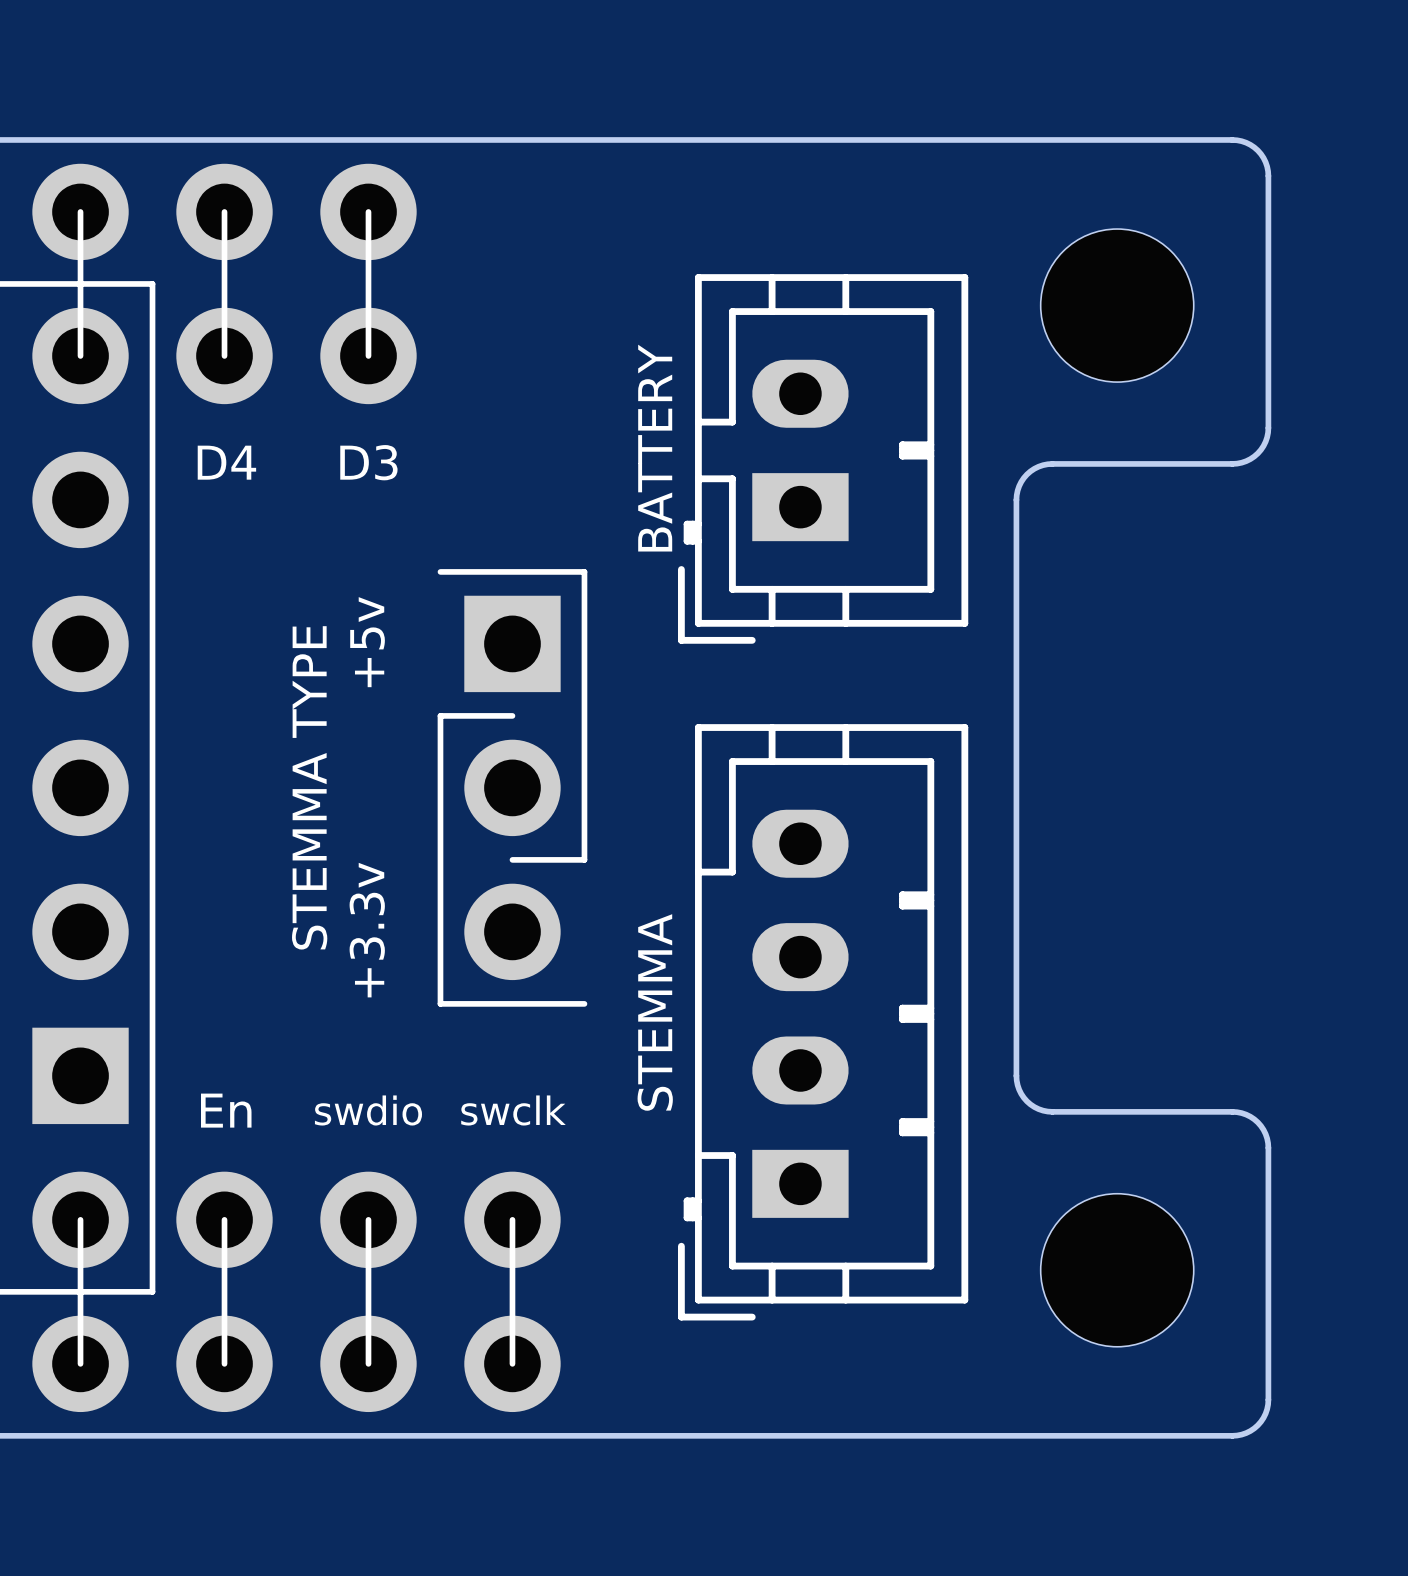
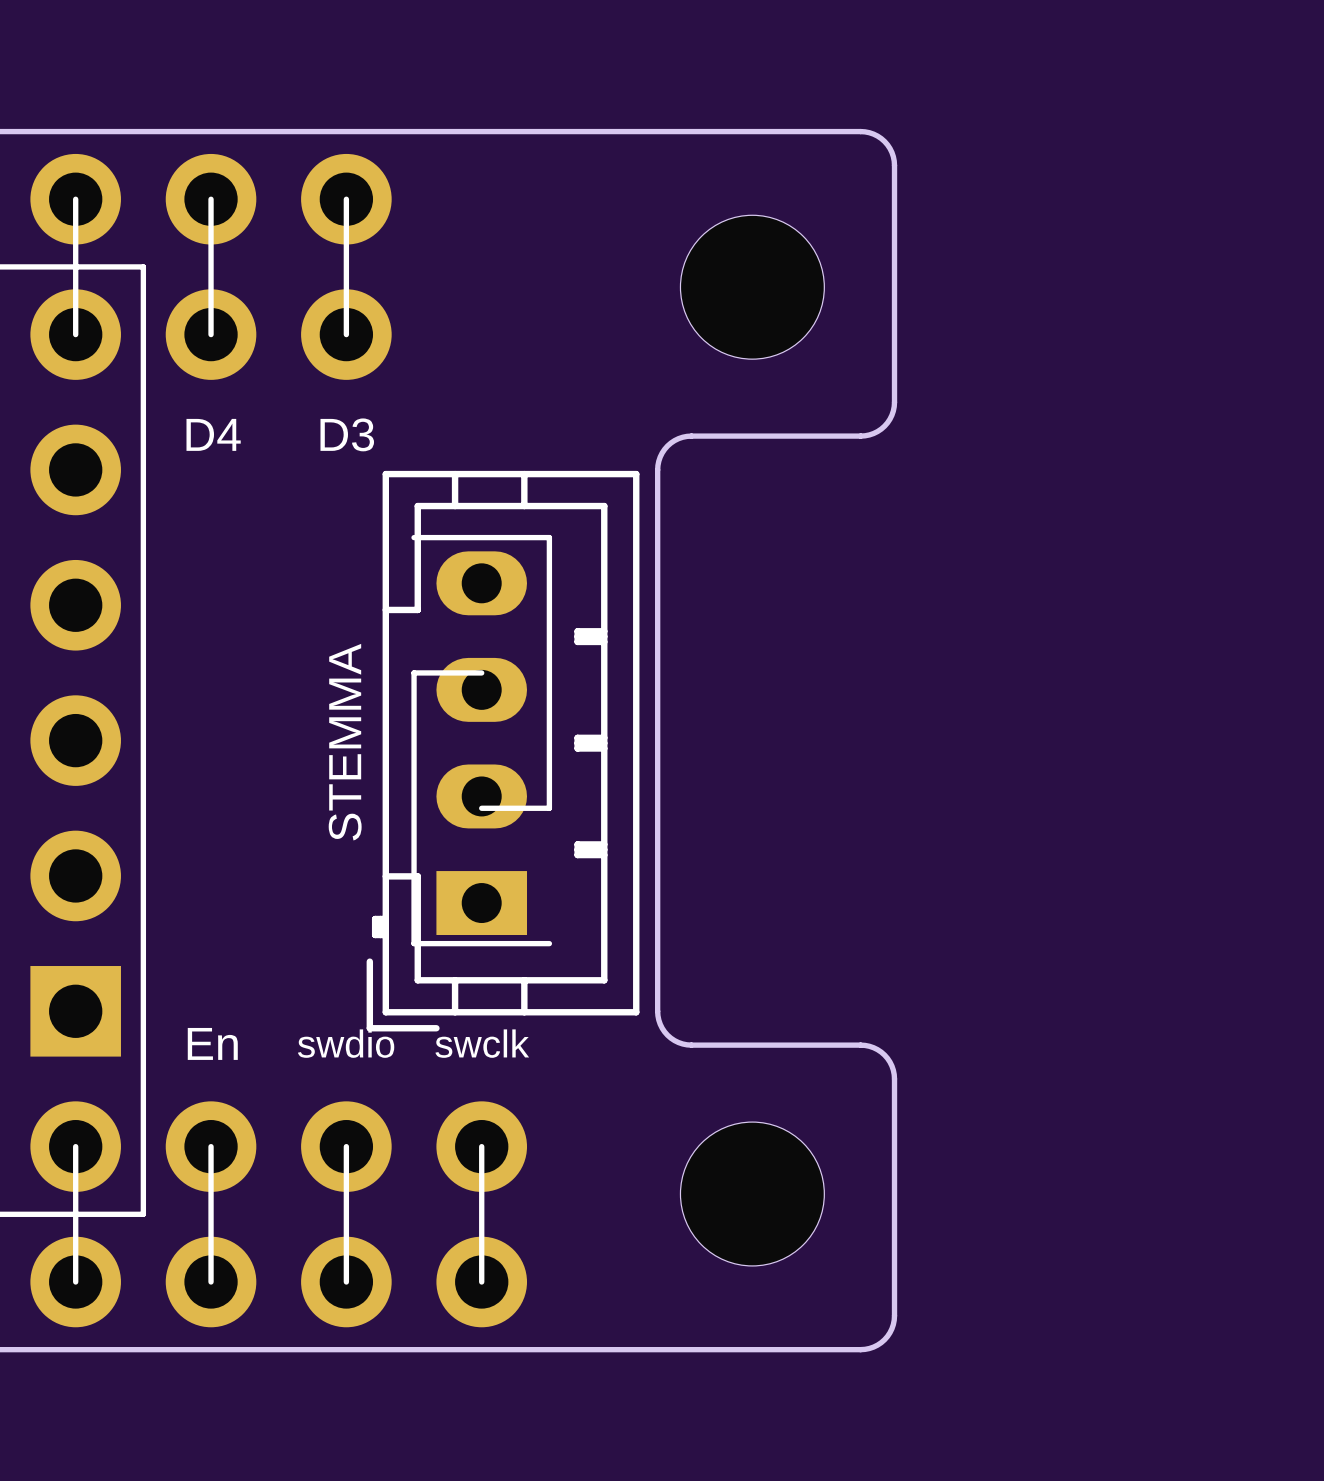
board edge: (915, 139) (1237, 140) (1254, 147) (1260, 154) (1267, 166) (1268, 427) (1265, 441) (1260, 449) (1250, 459) (1237, 463) (1043, 465) (1034, 468) (1023, 478) (1019, 486) (1016, 499) (1016, 1075) (1019, 1089) (1030, 1104) (1047, 1111) (1232, 1111) -> (860, 131) (869, 132) (881, 138) (889, 148) (894, 160) (894, 402) (889, 419) (877, 431) (865, 435) (682, 437) (667, 446) (660, 456) (657, 465) (657, 1011) (660, 1024) (667, 1035) (678, 1042) (691, 1045)
part position: (1117, 305) -> (752, 287)
part: BATTERY (823, 458) -> none
part footprint: [464, 595, 561, 981] -> [366, 470, 640, 1032]
text: +5v (367, 642) -> none
text: STEMMA TYPE (309, 787) -> none
part value: none -> STEMMA (345, 742)
text: +3.3v (367, 930) -> none
part: STEMMA (823, 1022) -> none
board edge: (1232, 1111) (1246, 1114) (1257, 1122) (1263, 1129) (1268, 1143) (1268, 1399) -> none
part position: (1117, 1270) -> (752, 1194)
board edge: (1268, 1399) (1267, 1409) (1260, 1421) (1250, 1431) (1237, 1435) (915, 1435) -> (691, 1045) (865, 1045) (881, 1052) (889, 1062) (894, 1078) (894, 1320) (889, 1332) (881, 1342) (869, 1348) (860, 1349)

